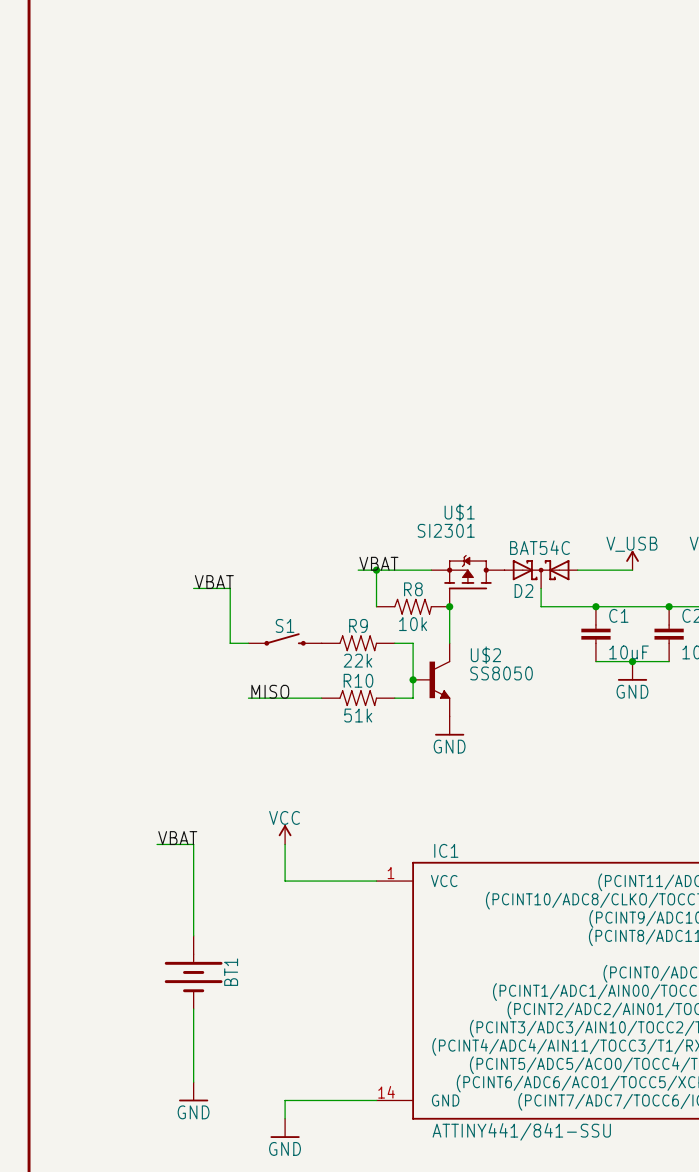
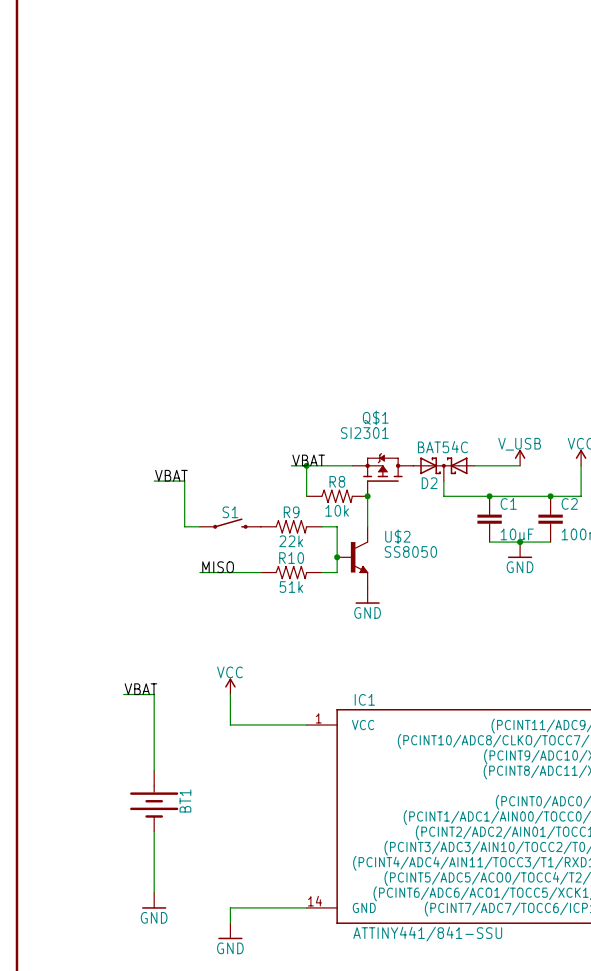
U$1 name: U$1 (459, 512) -> Q$1 (375, 417)

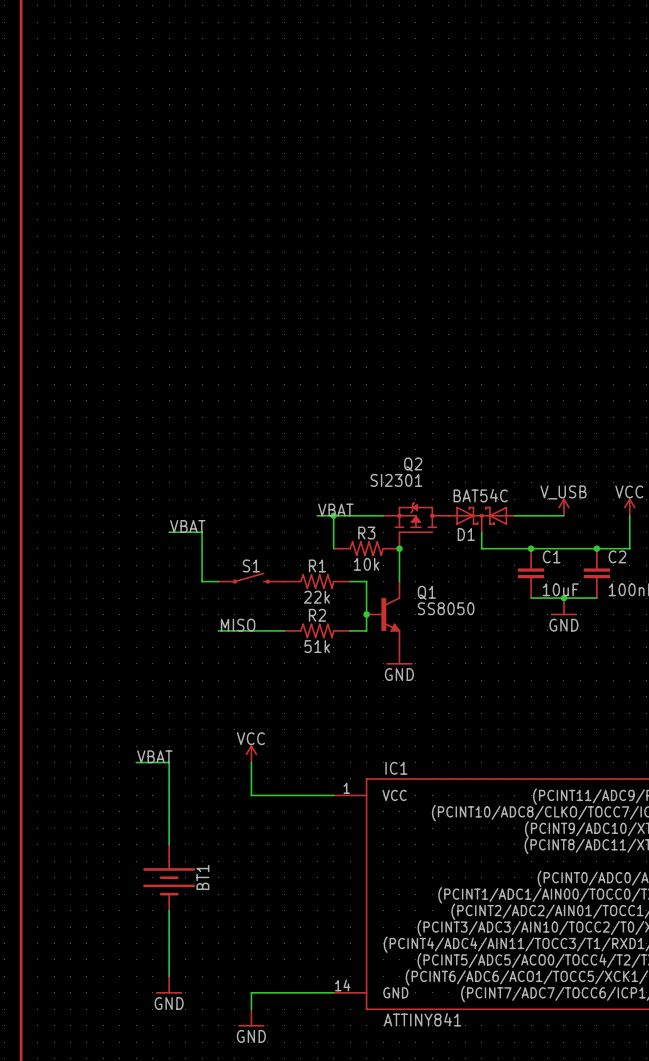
Q$1 name: Q$1 (375, 417) -> Q2 (413, 464)
R8 name: R8 (337, 481) -> R3 (366, 533)
D2 name: D2 (429, 483) -> D1 (466, 534)
R9 name: R9 (291, 512) -> R1 (317, 565)
U$2 name: U$2 (397, 536) -> Q1 (426, 592)
R10 name: R10 (291, 558) -> R2 (317, 615)
IC1 value: ATTINY441/841-SSU (427, 934) -> ATTINY841 (422, 1019)

